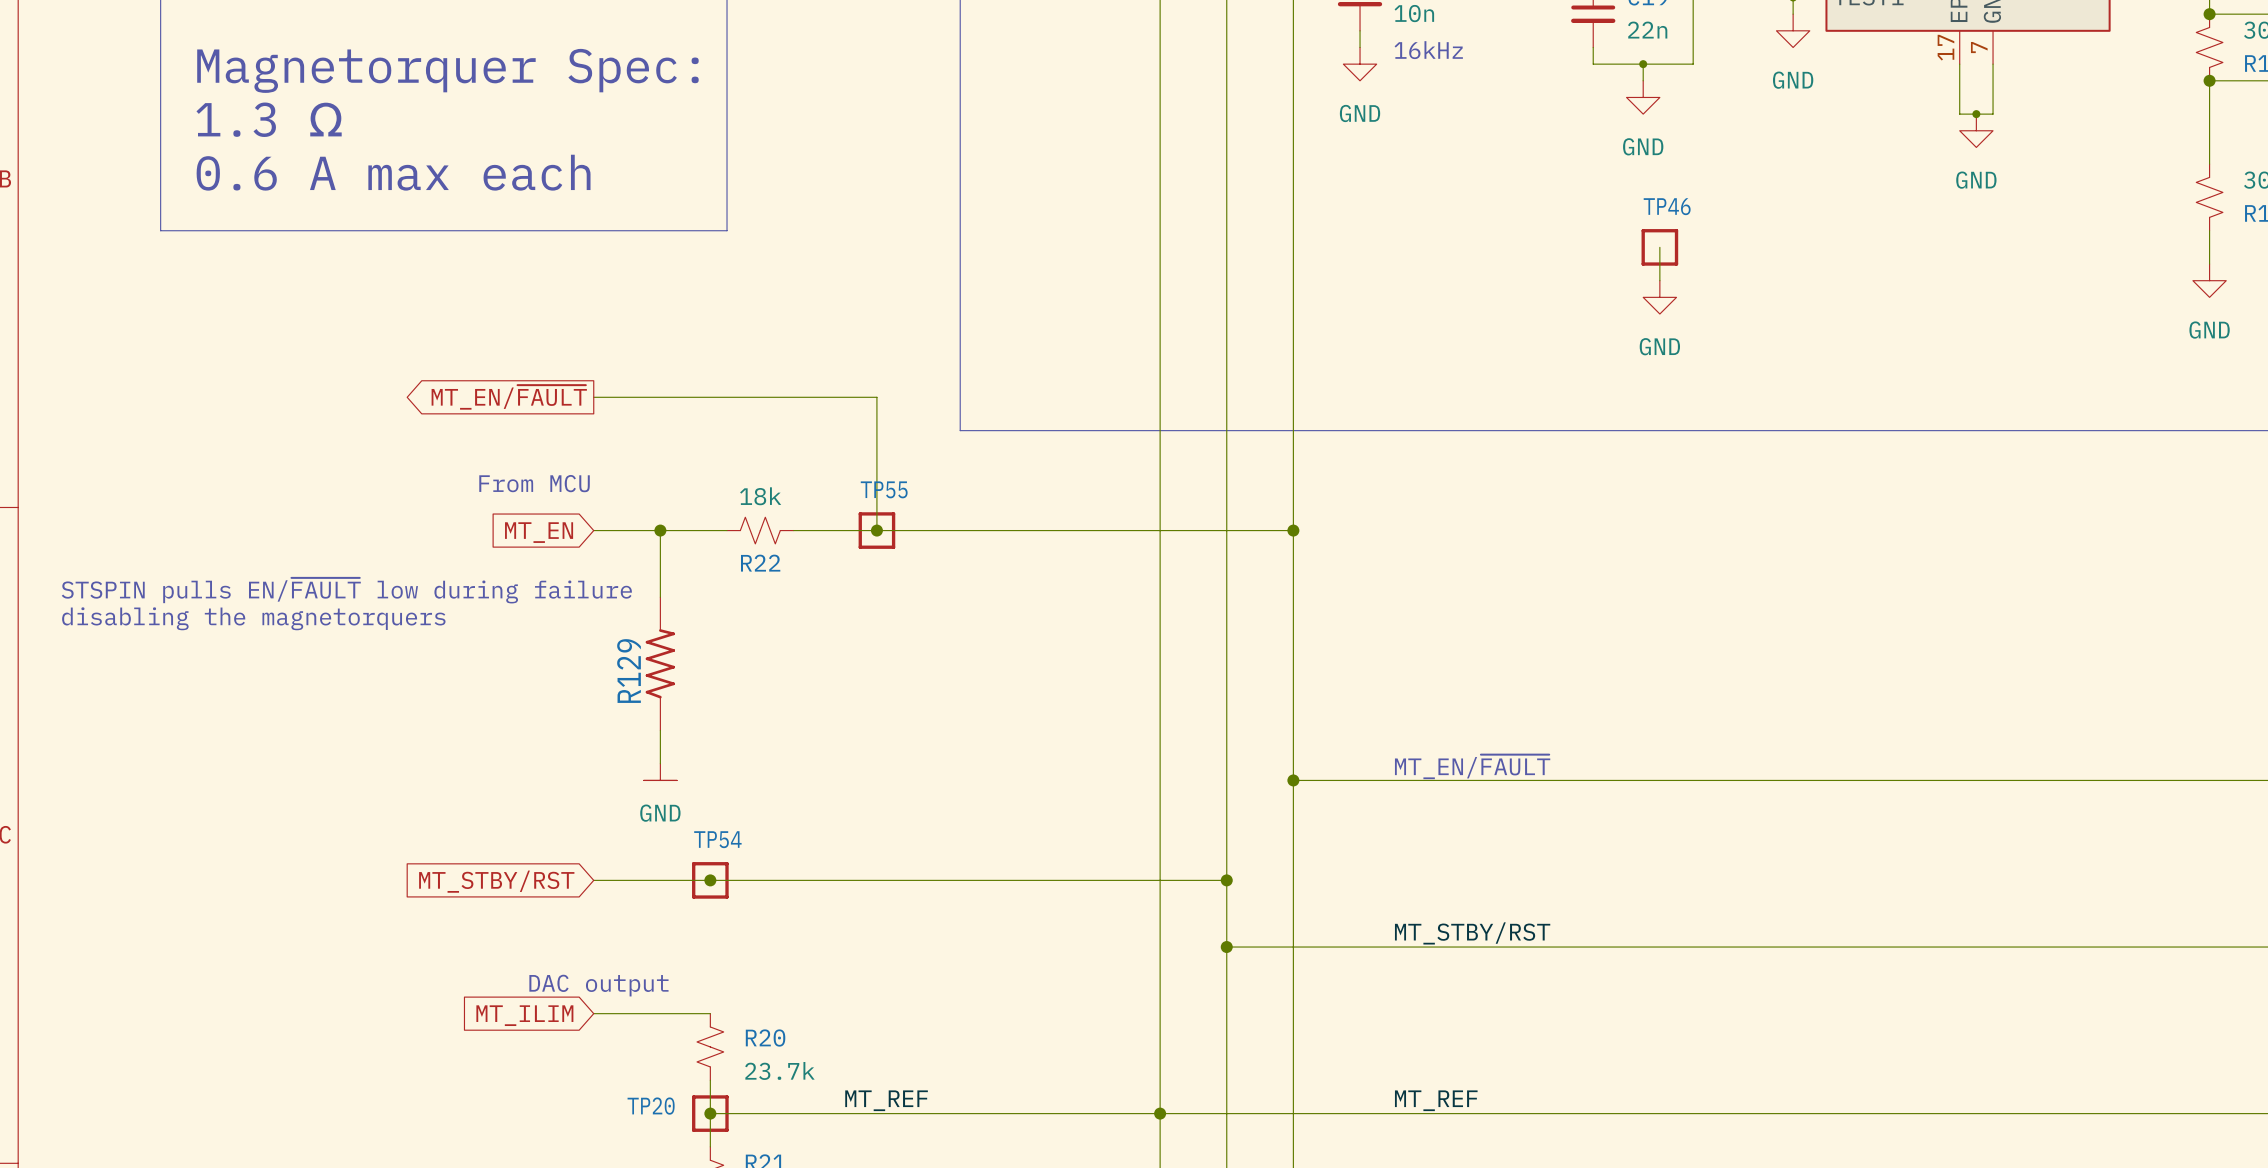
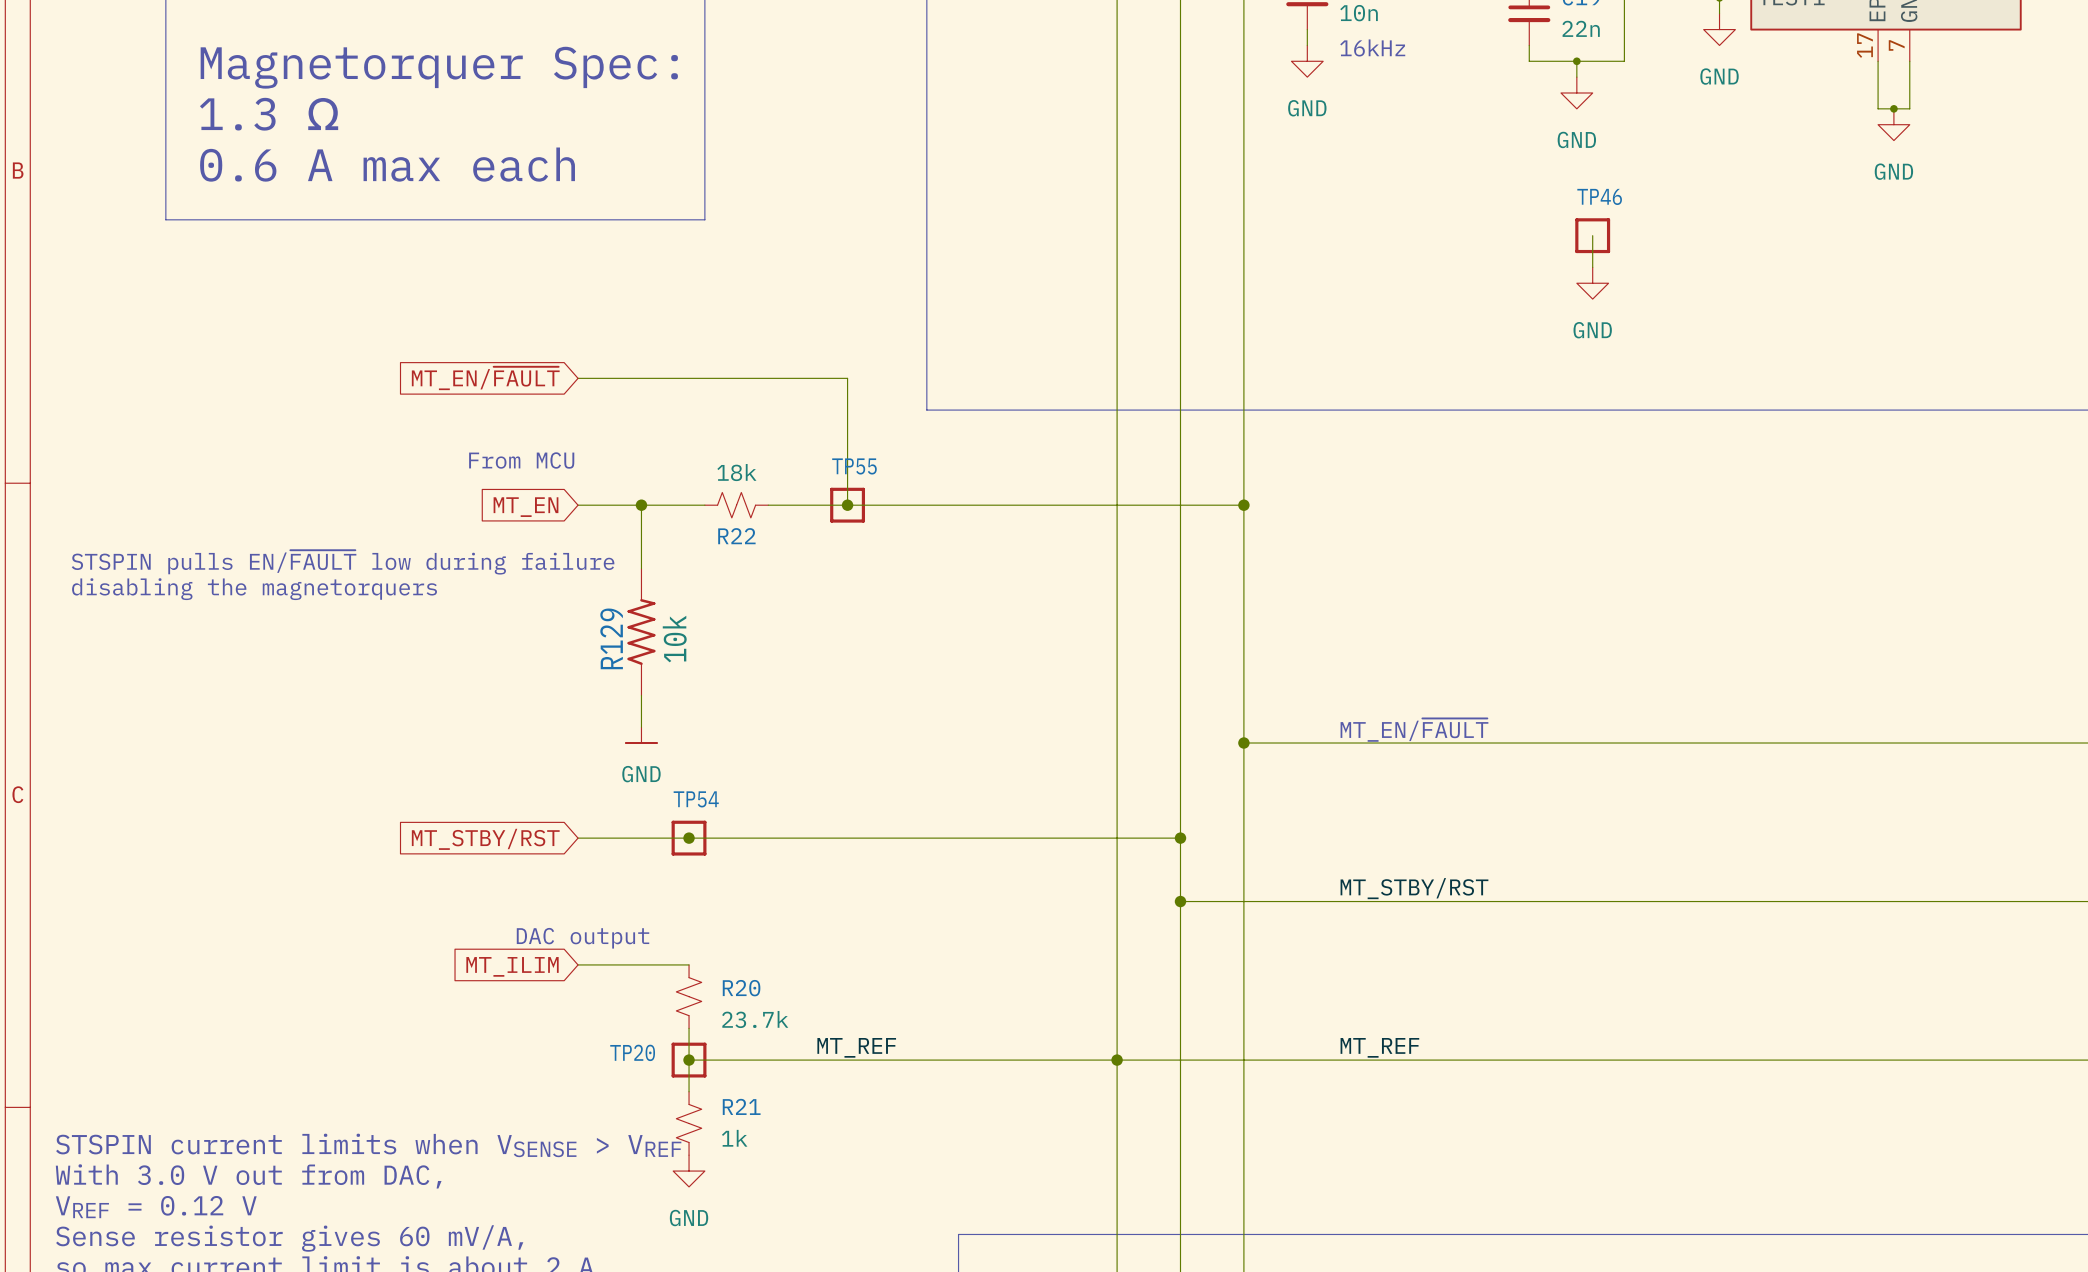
global label shape: output (509, 397) -> input (485, 378)
R129 value: none -> 10k (674, 639)

